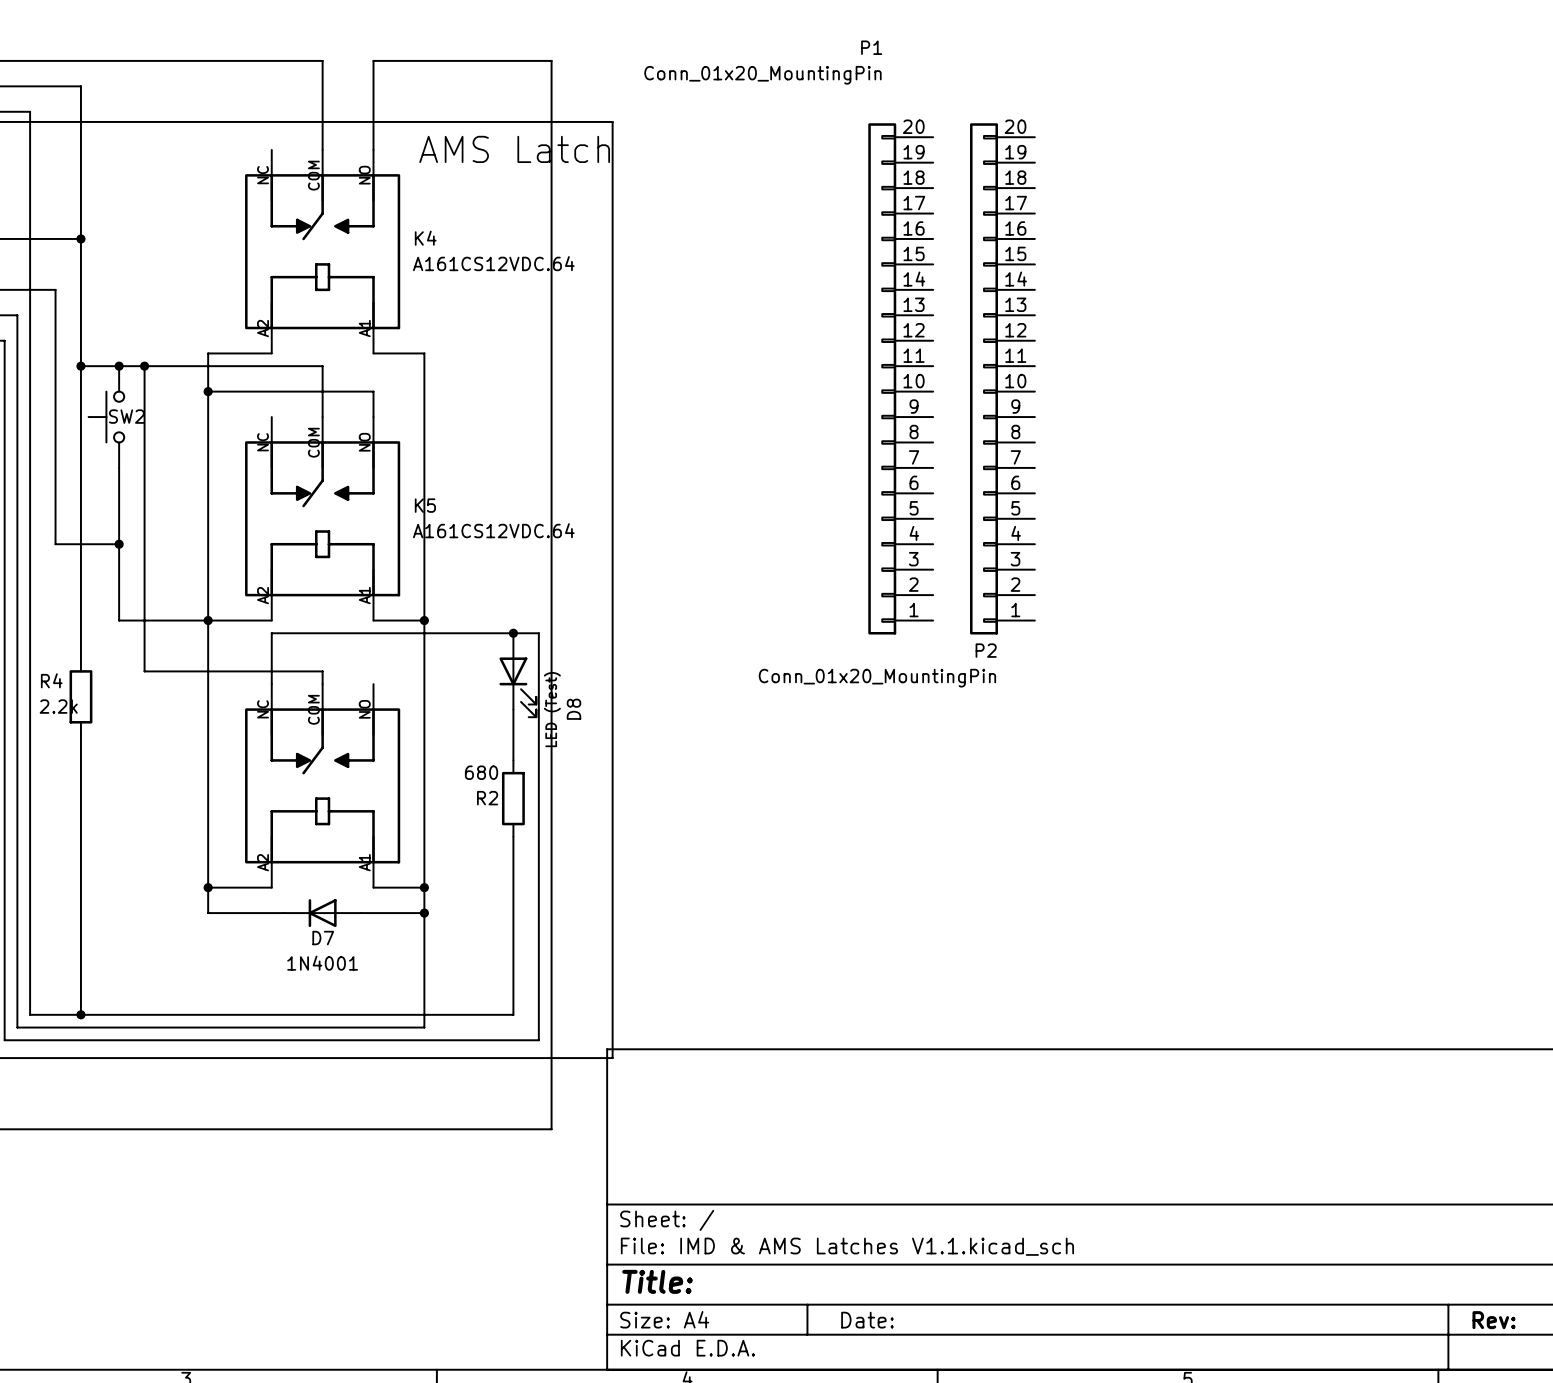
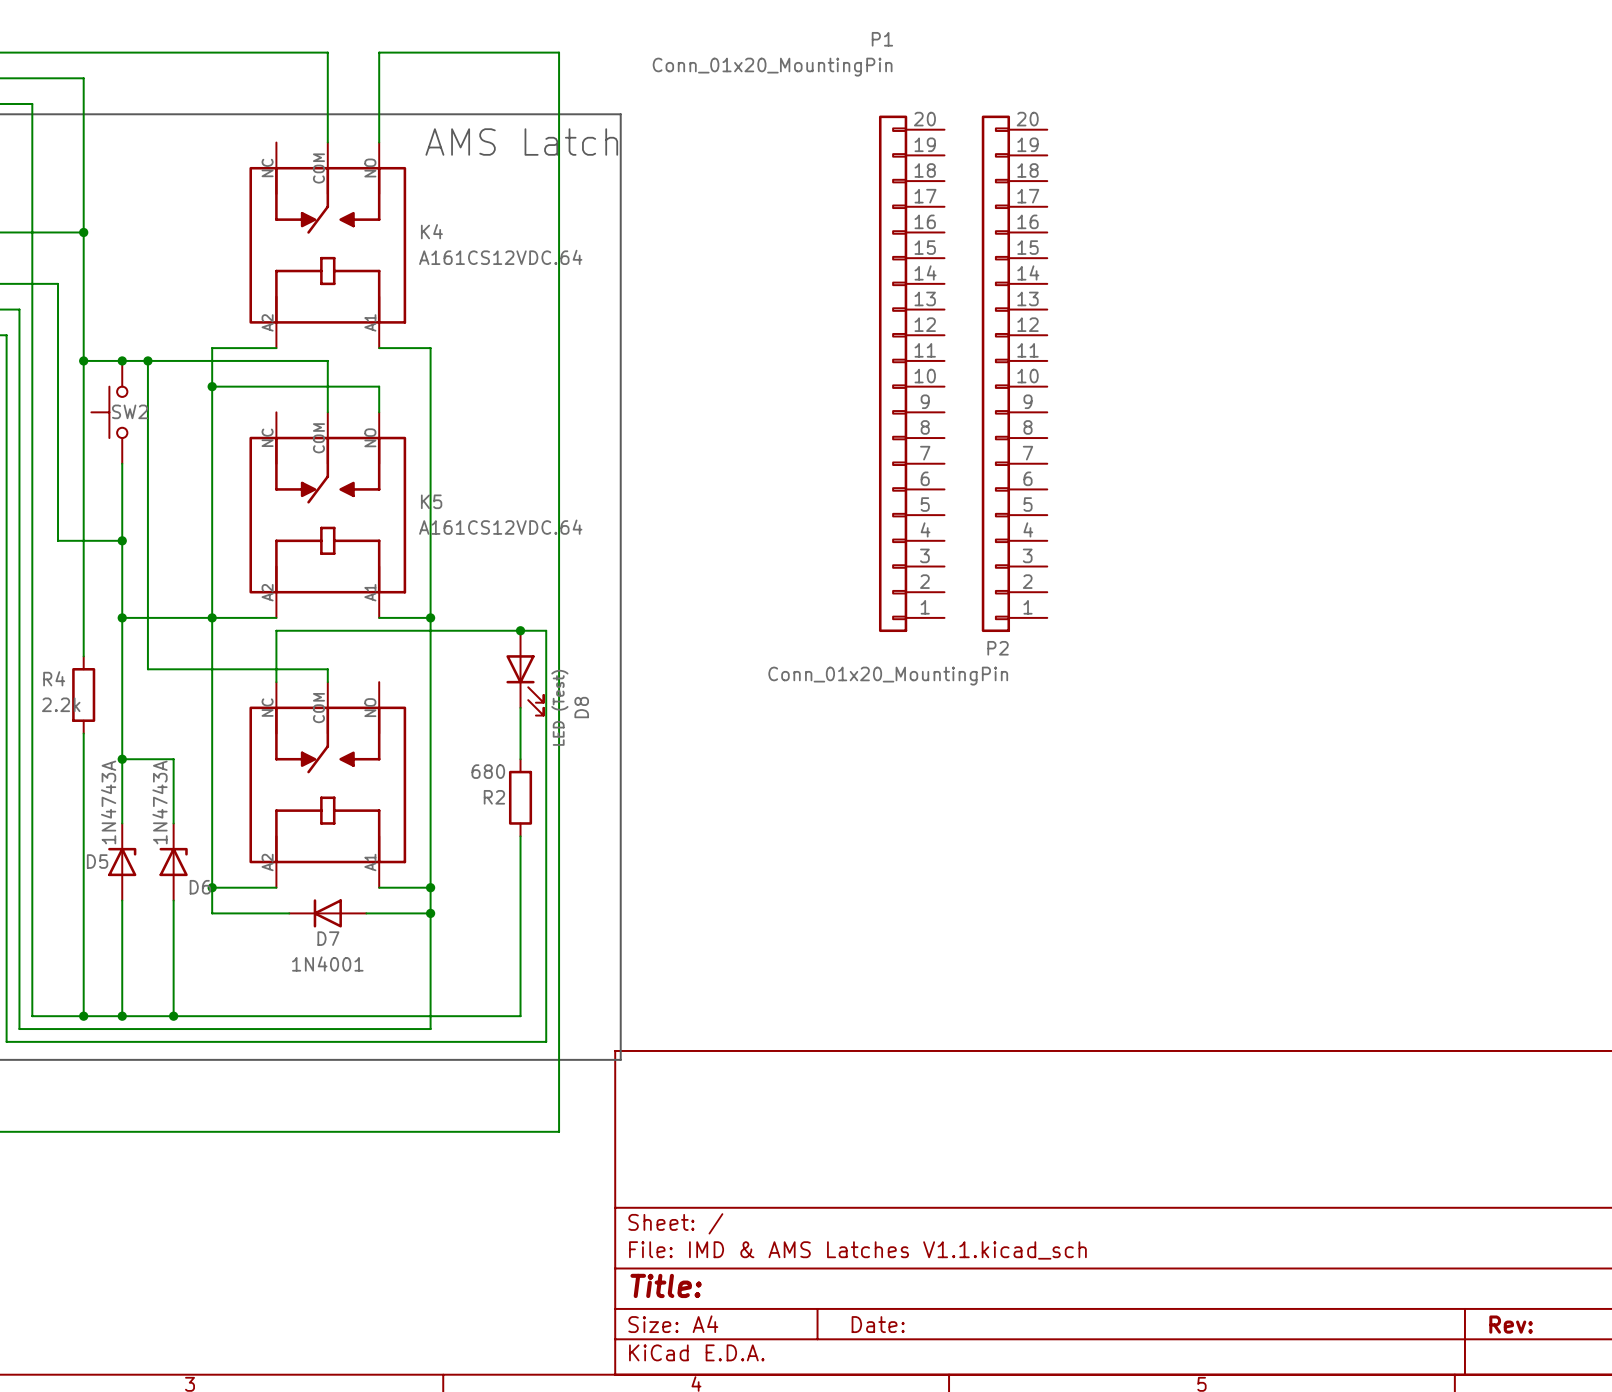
wire: none -> (122, 617) (122, 823)
junction: none -> (122, 617)
wire: none -> (122, 759) (173, 759) (173, 823)
junction: none -> (122, 759)
D5: none -> 1N4743A (122, 862)
D6: none -> 1N4743A (173, 862)
wire: none -> (122, 900) (122, 1016)
wire: none -> (173, 900) (173, 1016)
junction: none -> (122, 1016)
junction: none -> (173, 1016)

